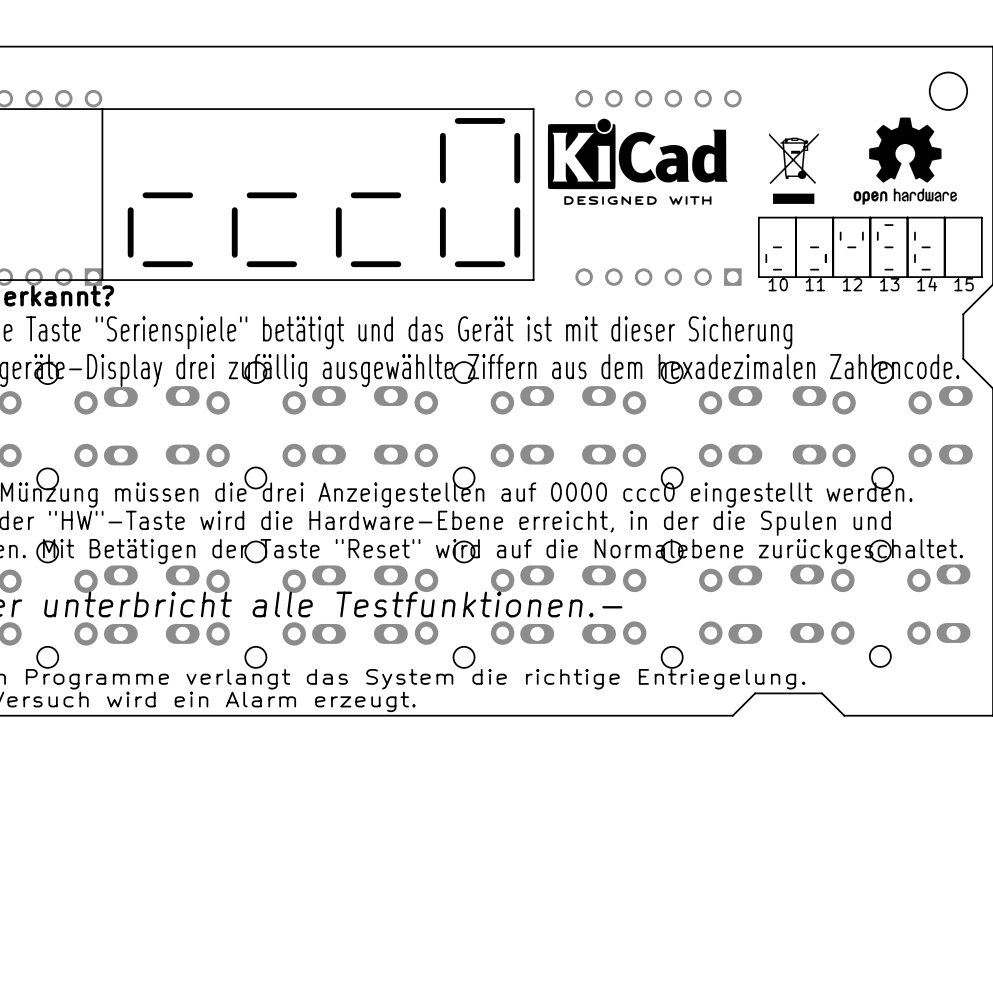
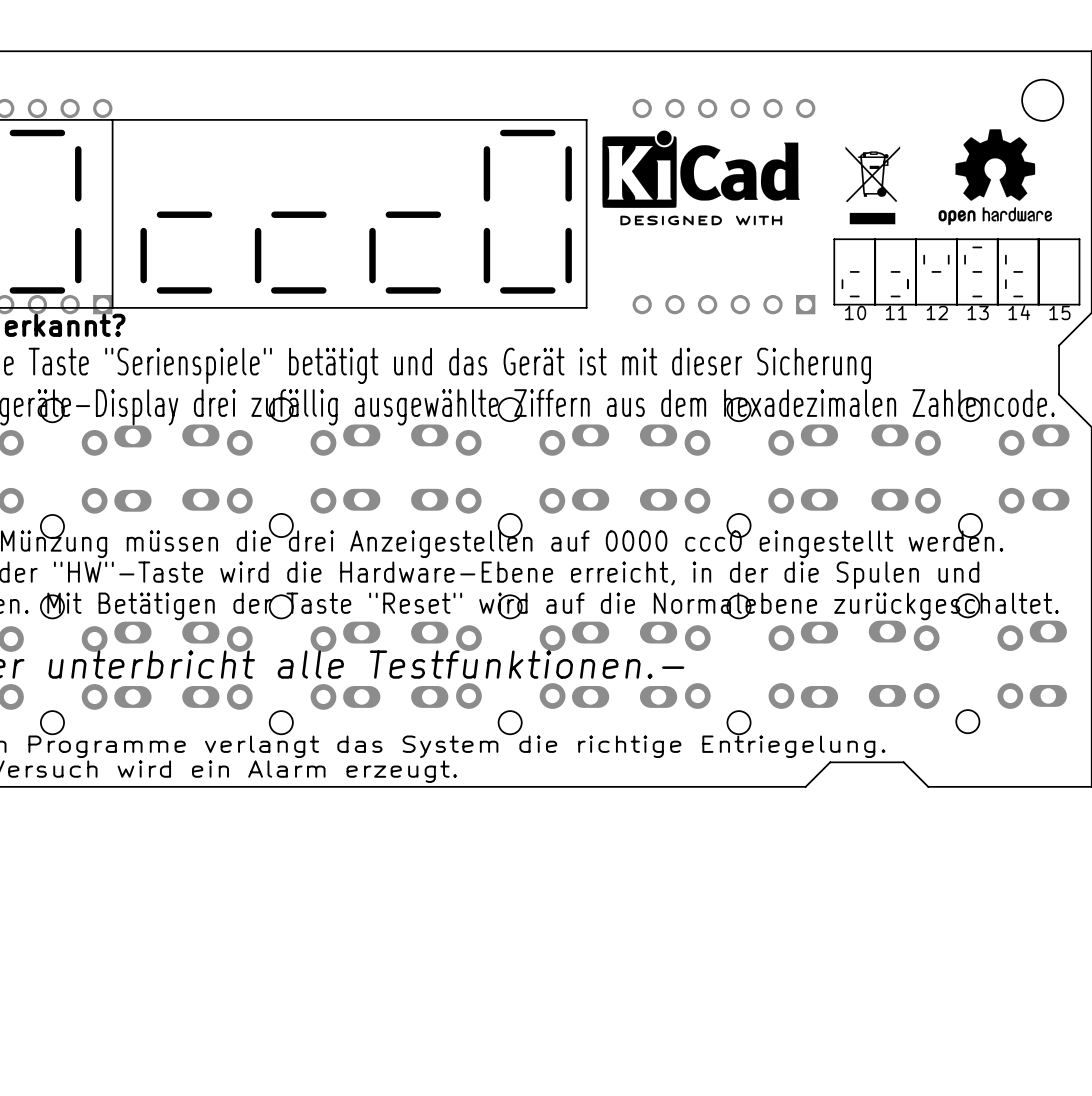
line: none -> (61, 132) (12, 132)
line: none -> (78, 149) (78, 198)
line: none -> (78, 231) (78, 280)
line: none -> (61, 290) (12, 290)

